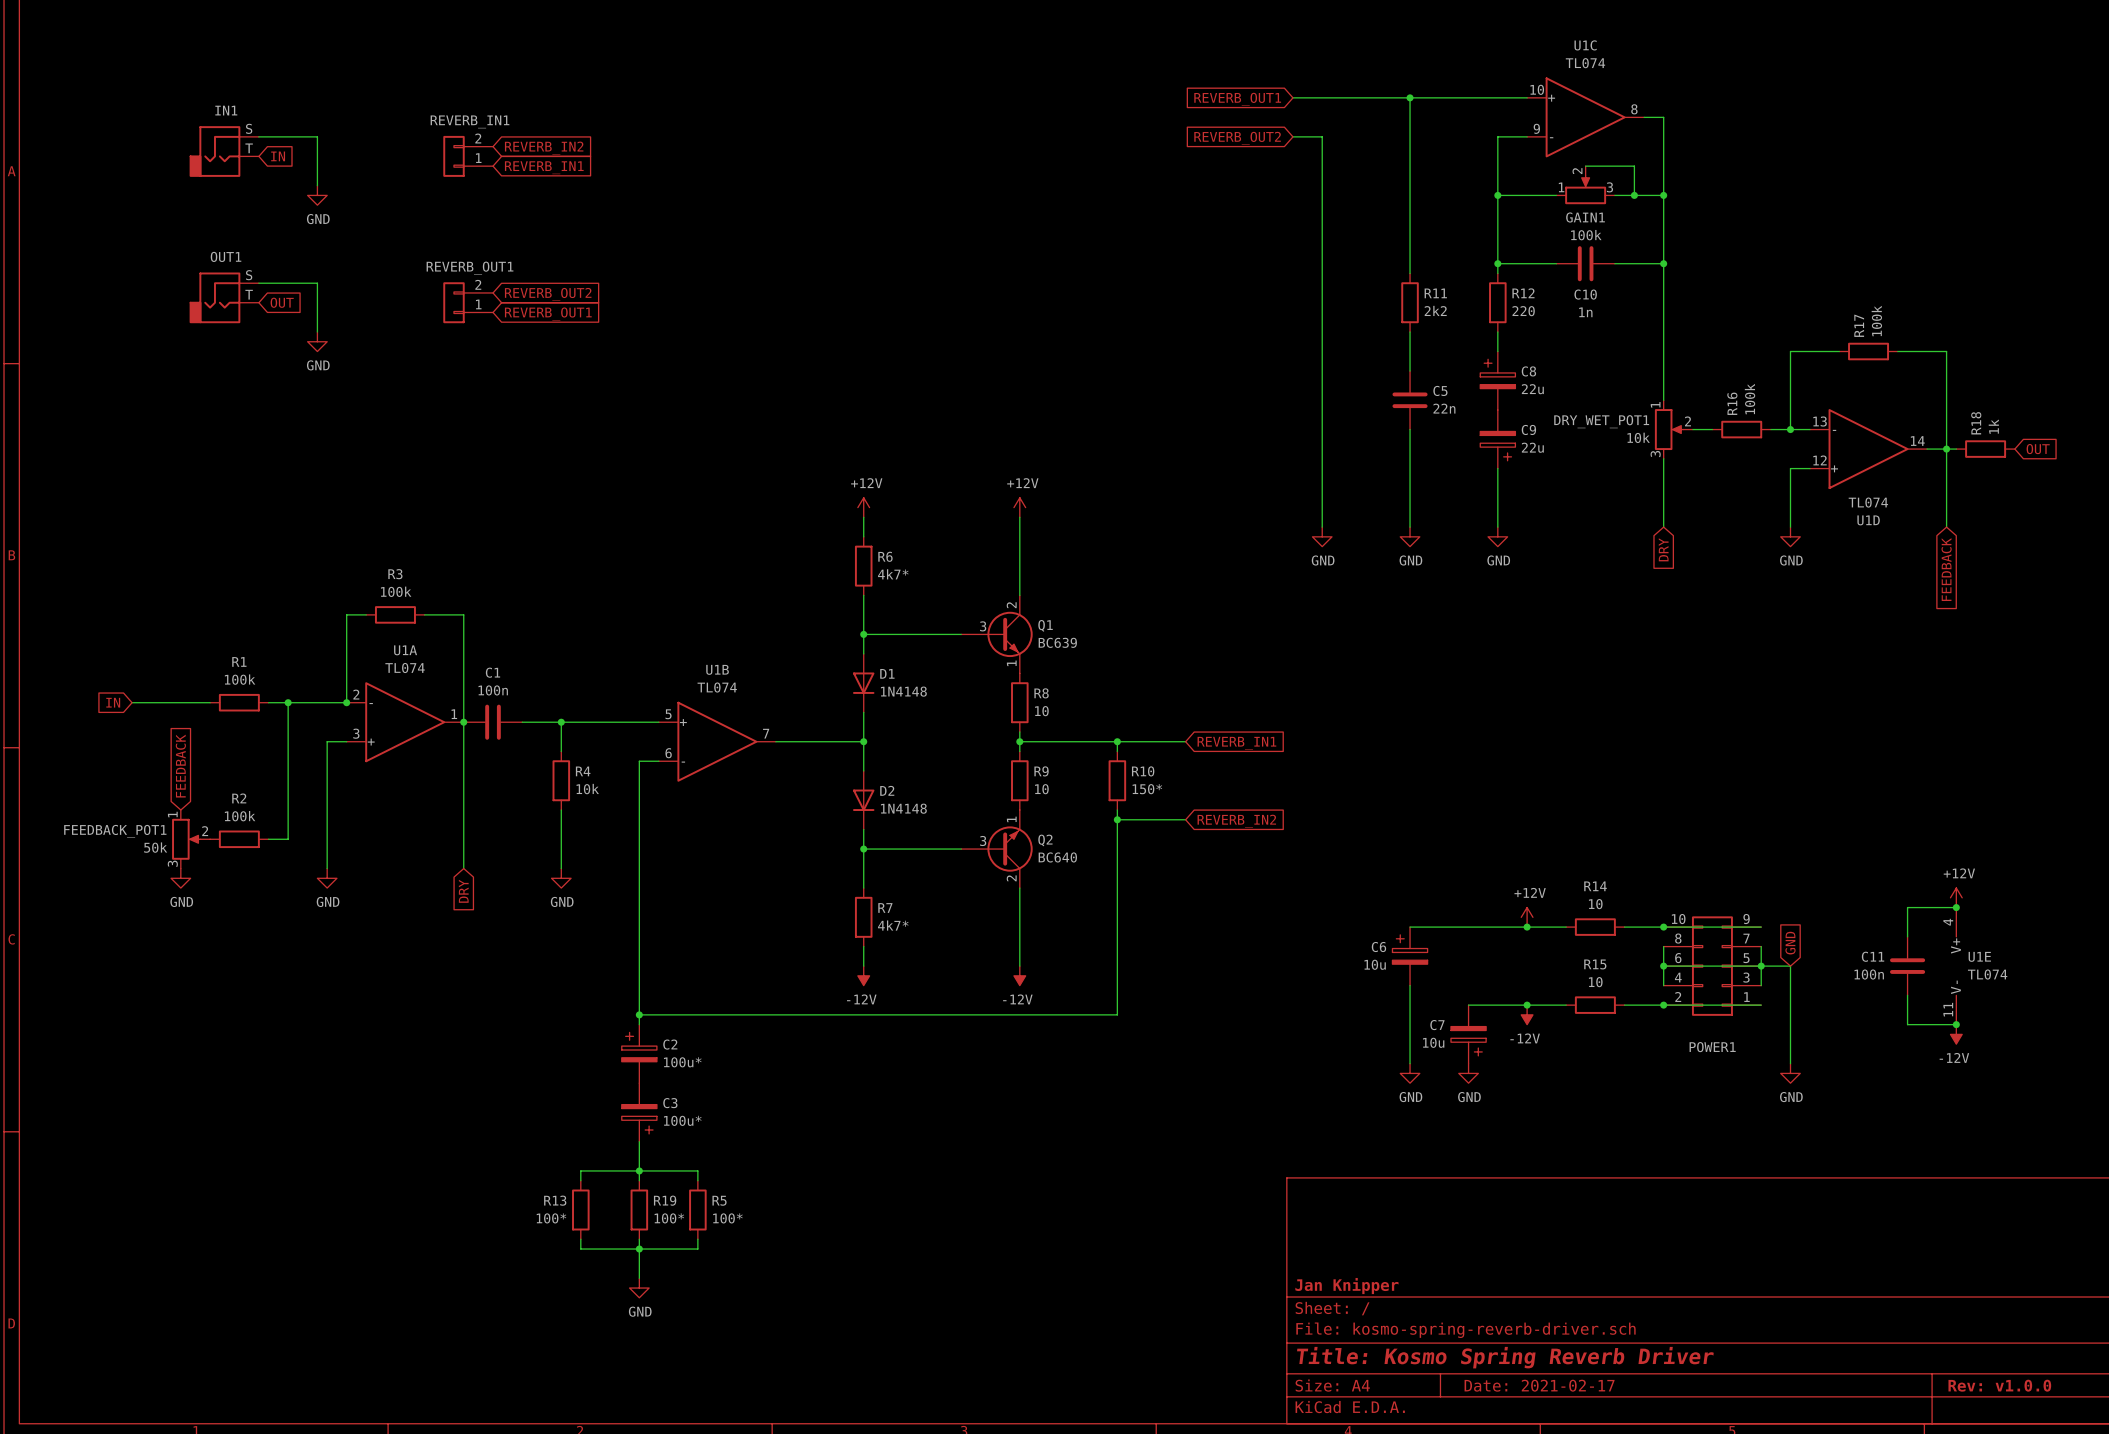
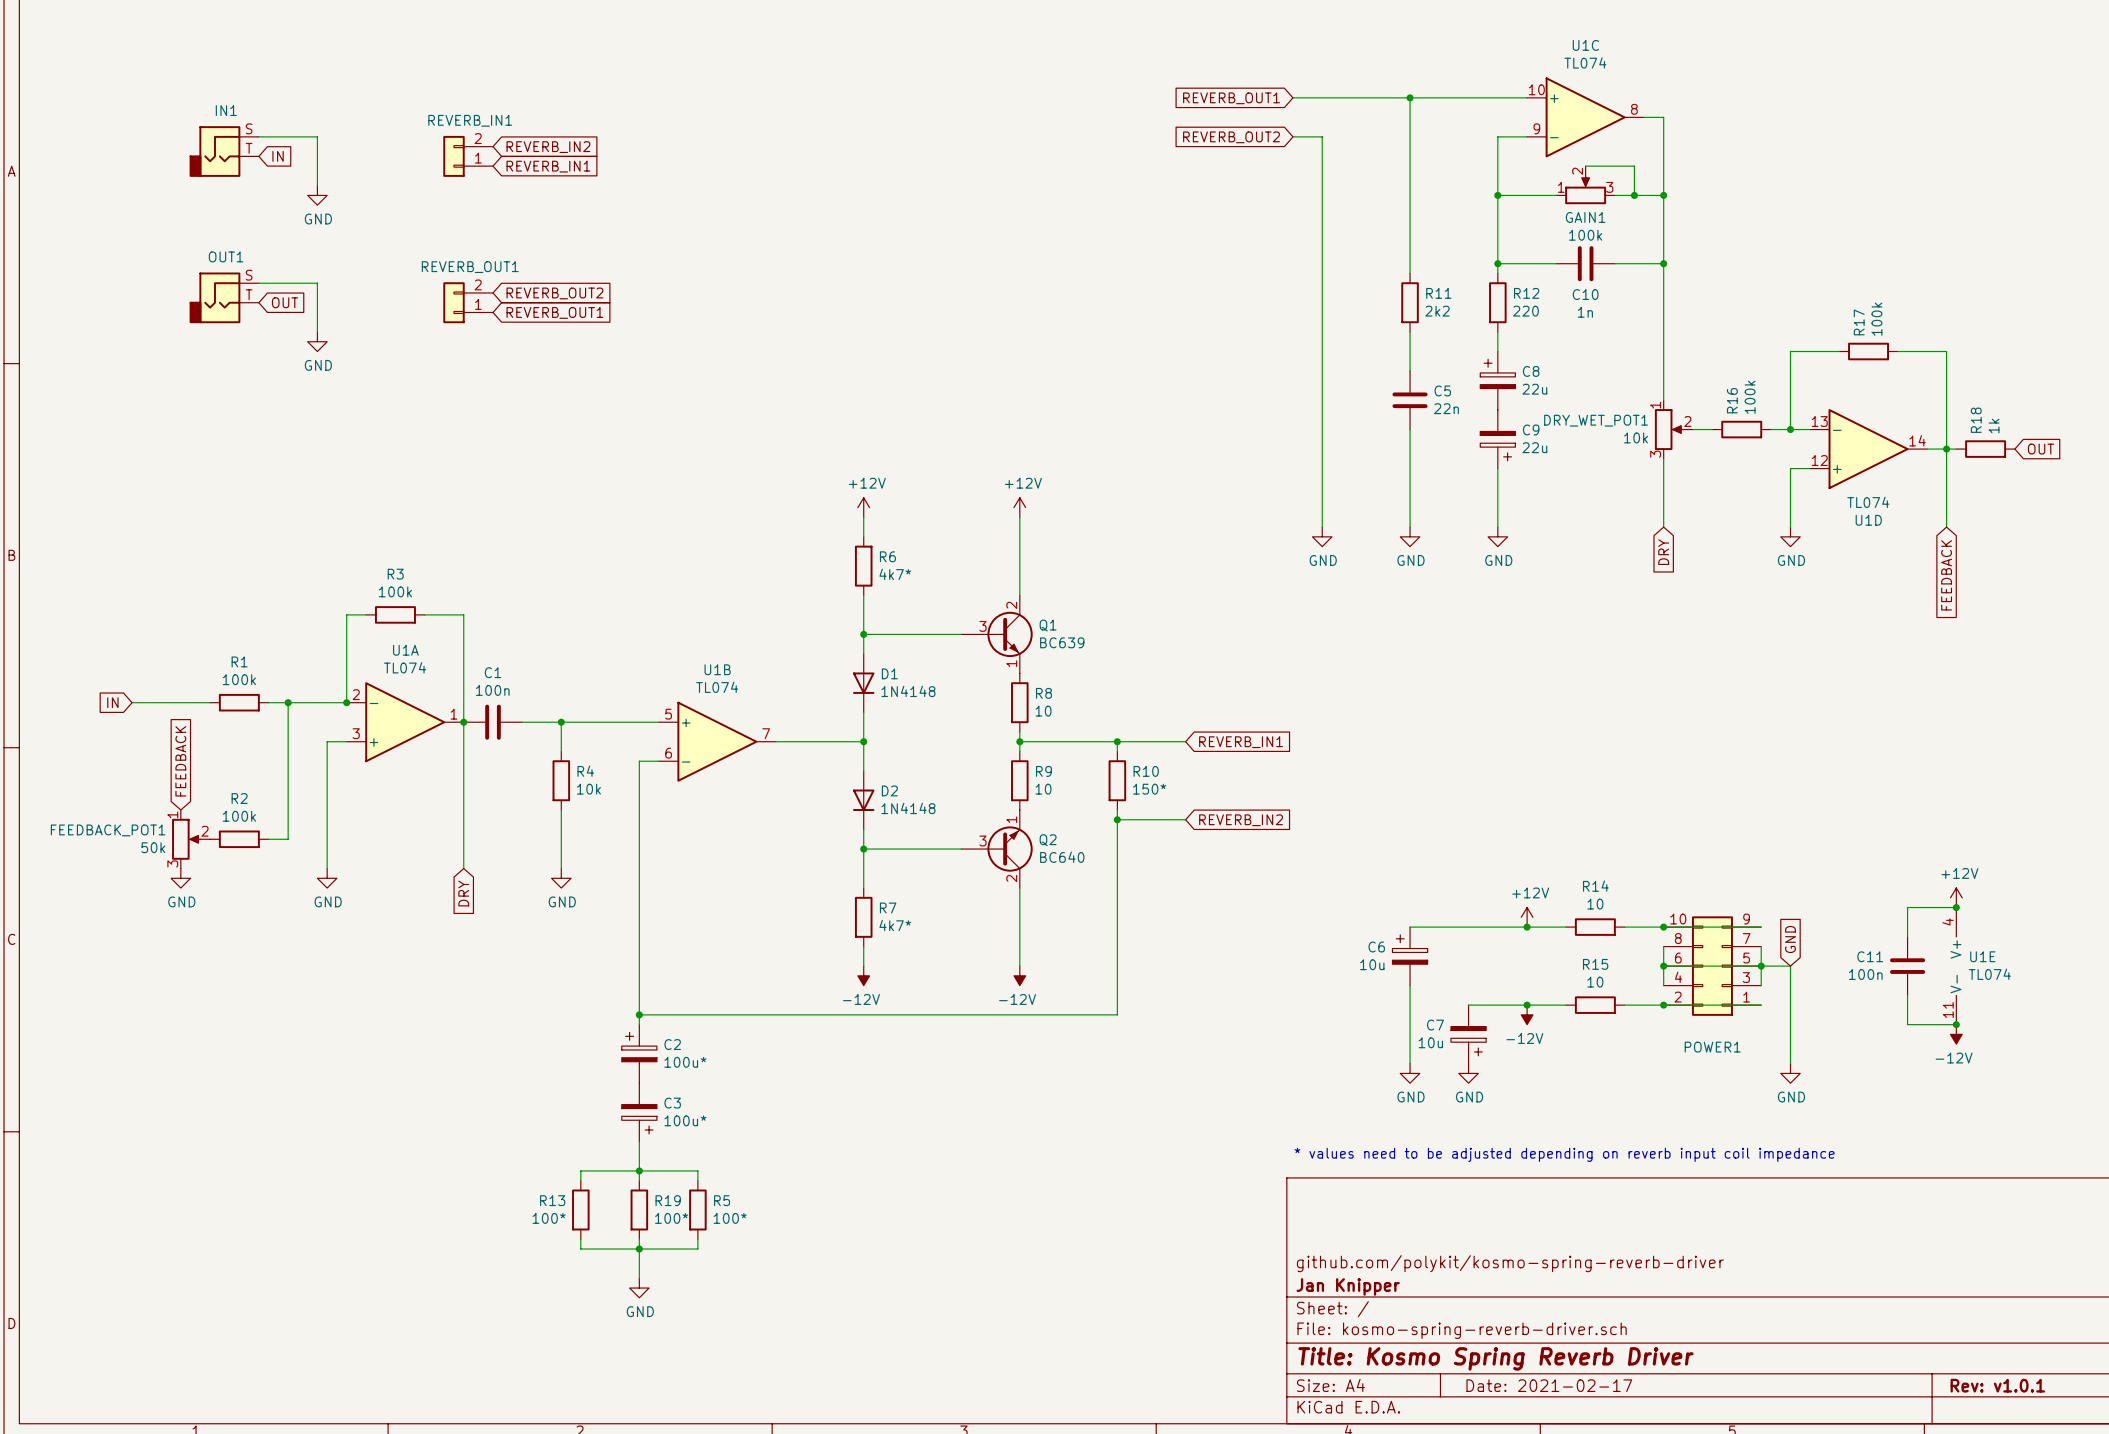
text: none -> * values need to be adjusted depending on reverb input coil impedance (1564, 1154)
title block: none -> github.com/polykit/kosmo-spring-reverb-driver (1510, 1263)
title block: Rev: v1.0.0 (1999, 1385) -> Rev: v1.0.1 (1997, 1385)

